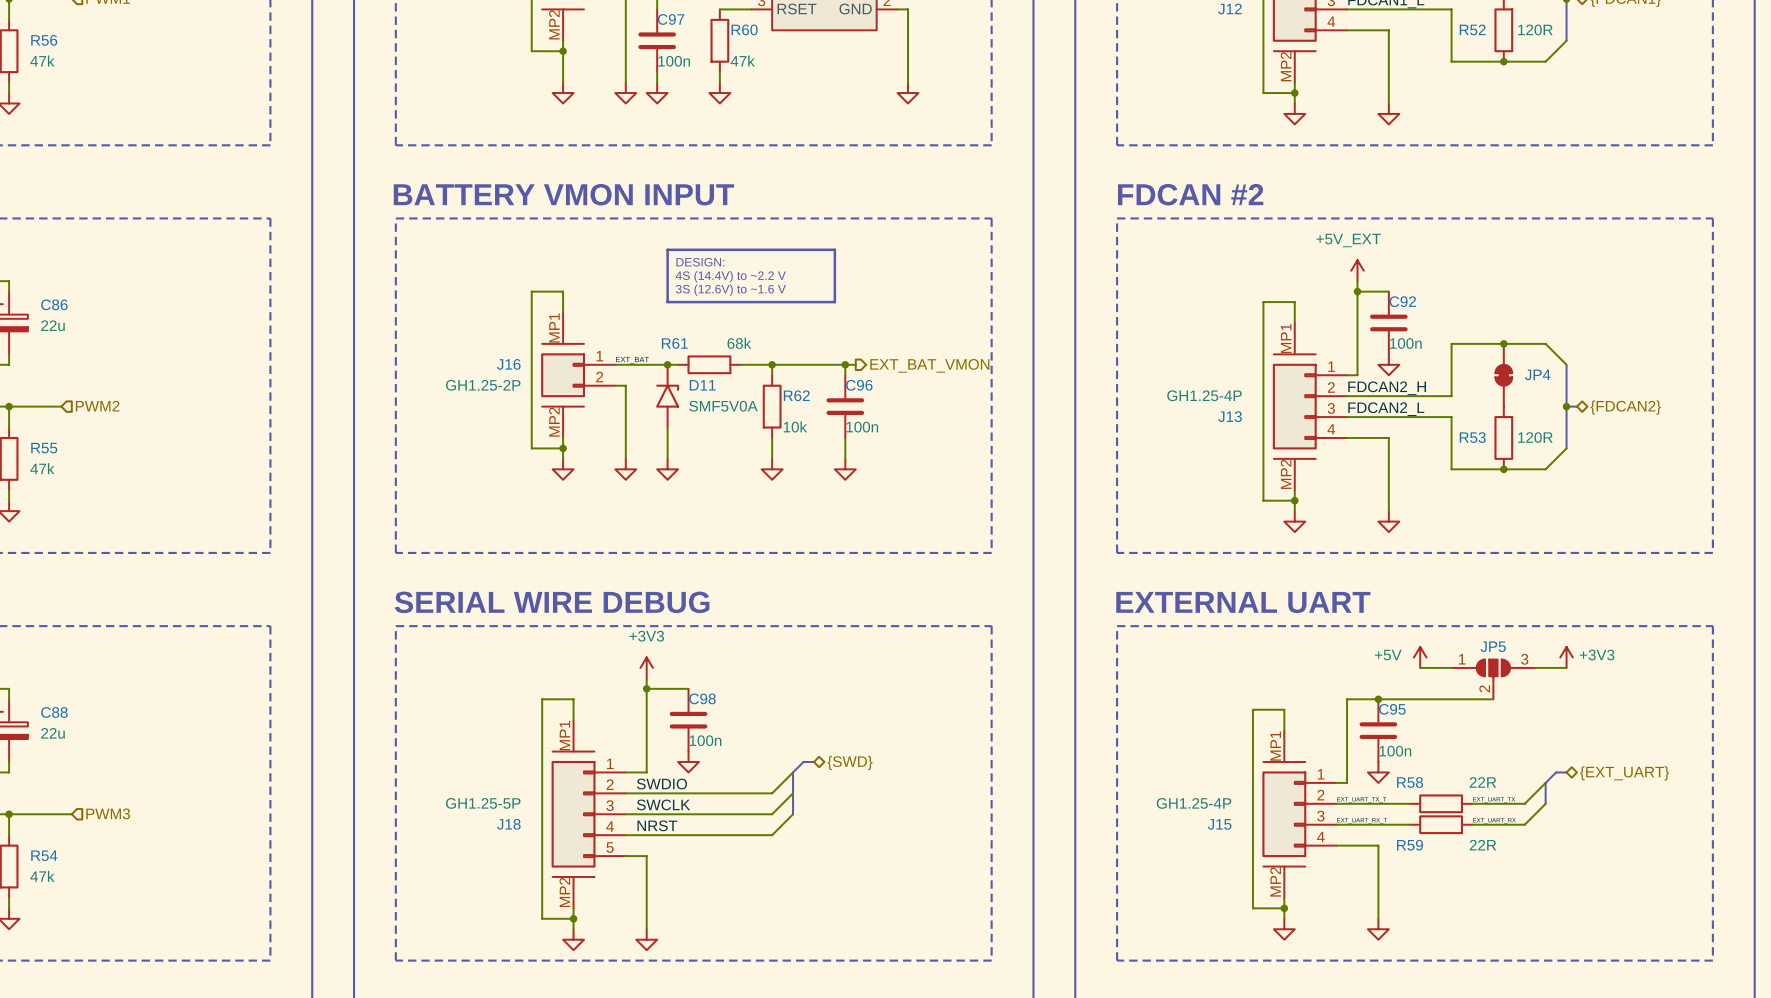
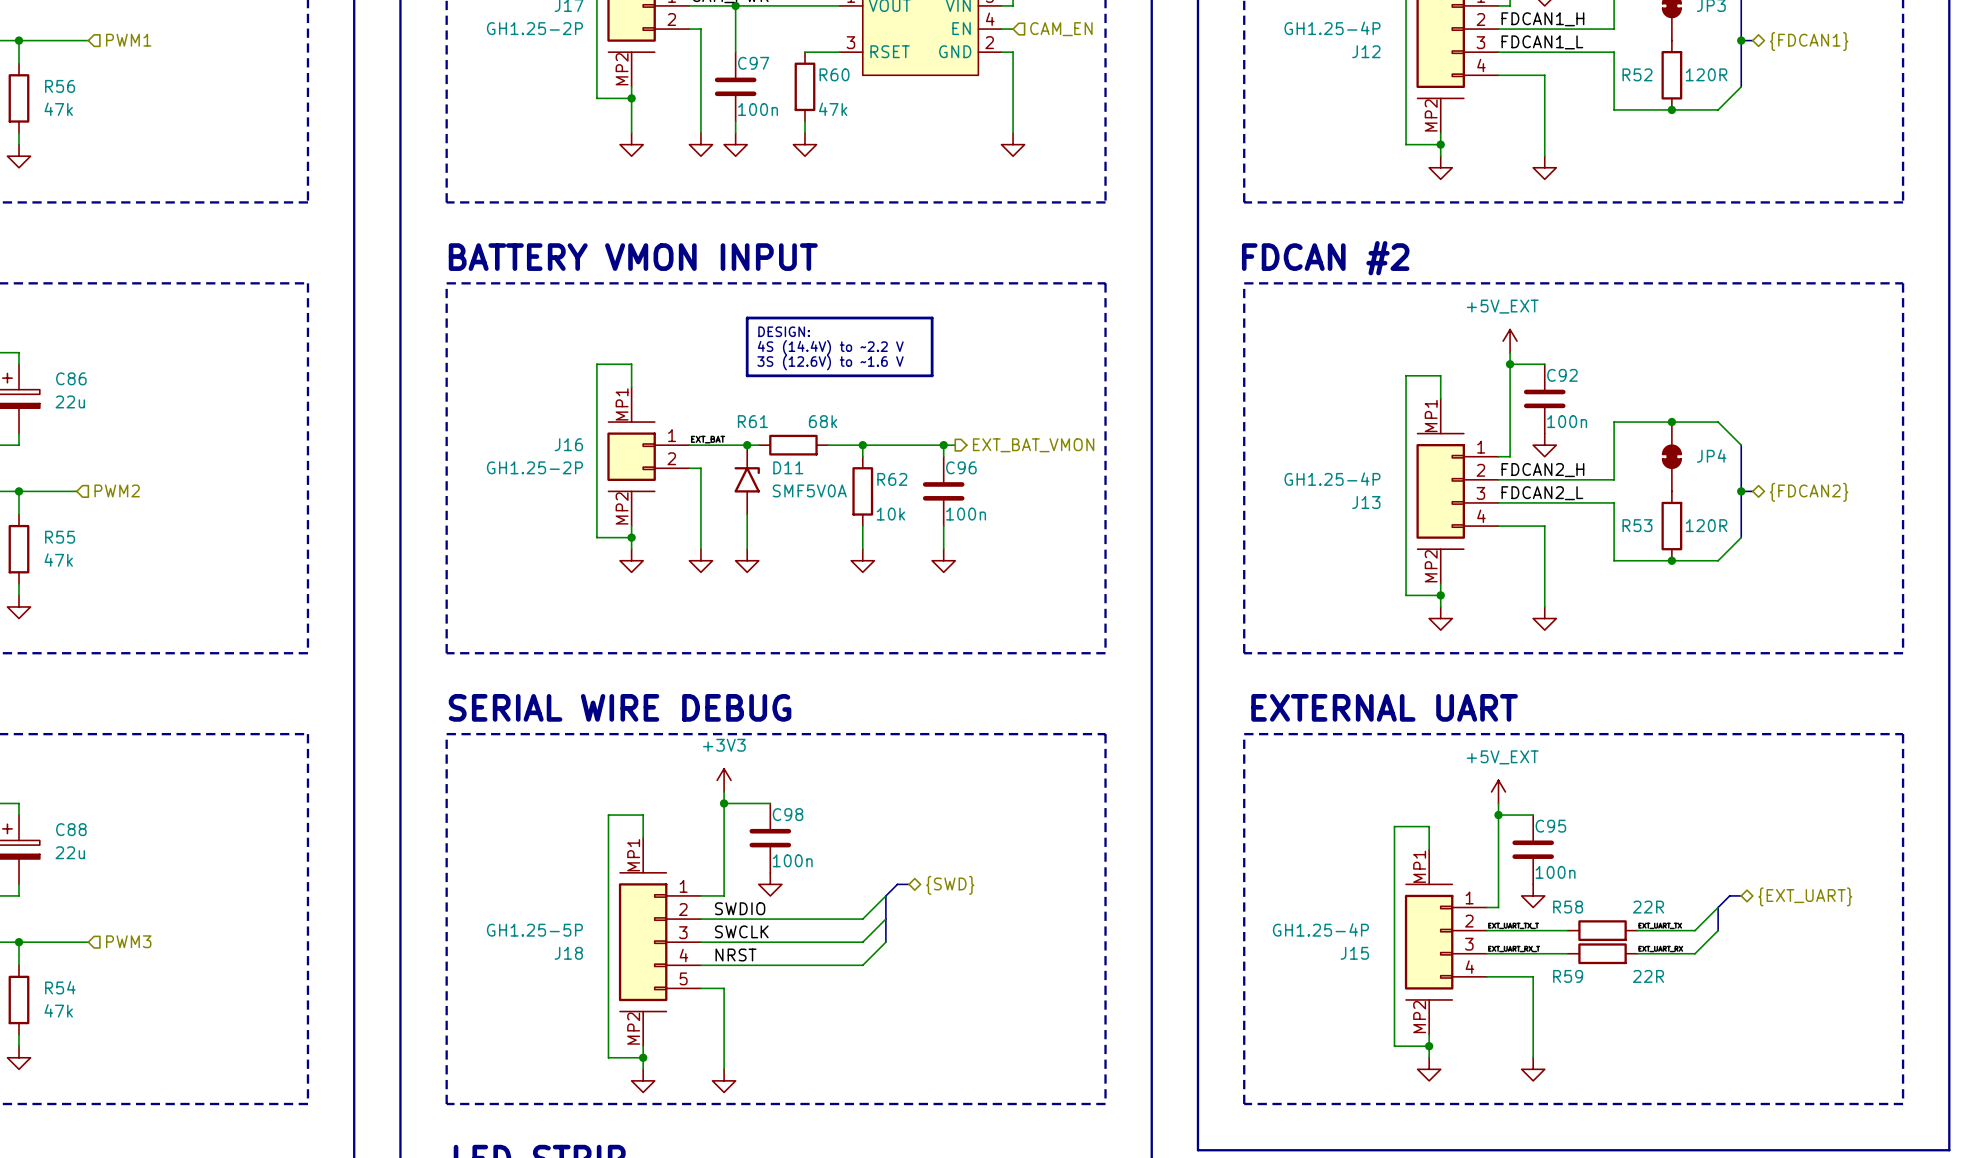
power symbol: +5V (1420, 657) -> none
power symbol: +3V3 (1566, 657) -> none
wire: (1420, 667) (1451, 667) -> none
wire: (1535, 667) (1566, 667) -> none
power symbol: none -> +5V_EXT (1498, 791)
JP5: (1493, 679) -> none
wire: none -> (1498, 803) (1498, 815)
wire: (1378, 699) (1493, 699) -> none
junction position: (1378, 699) -> (1498, 815)

